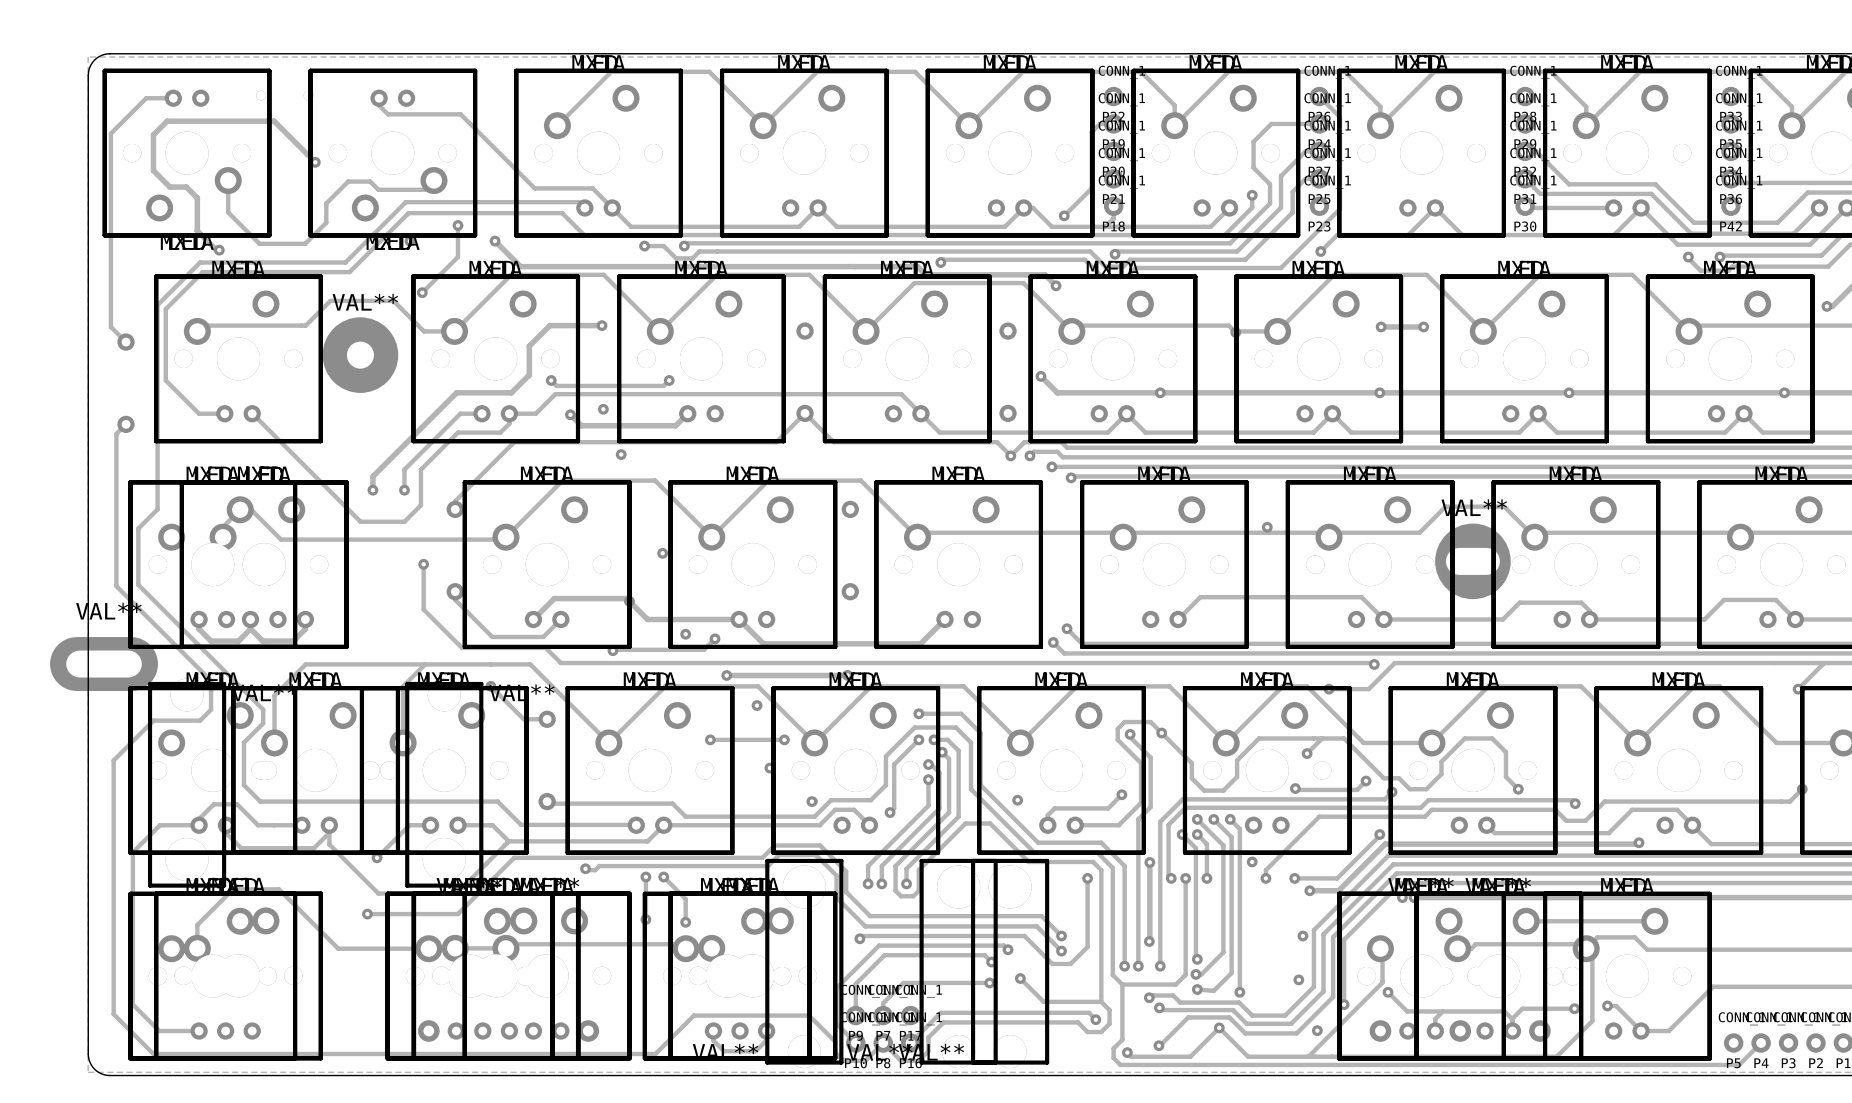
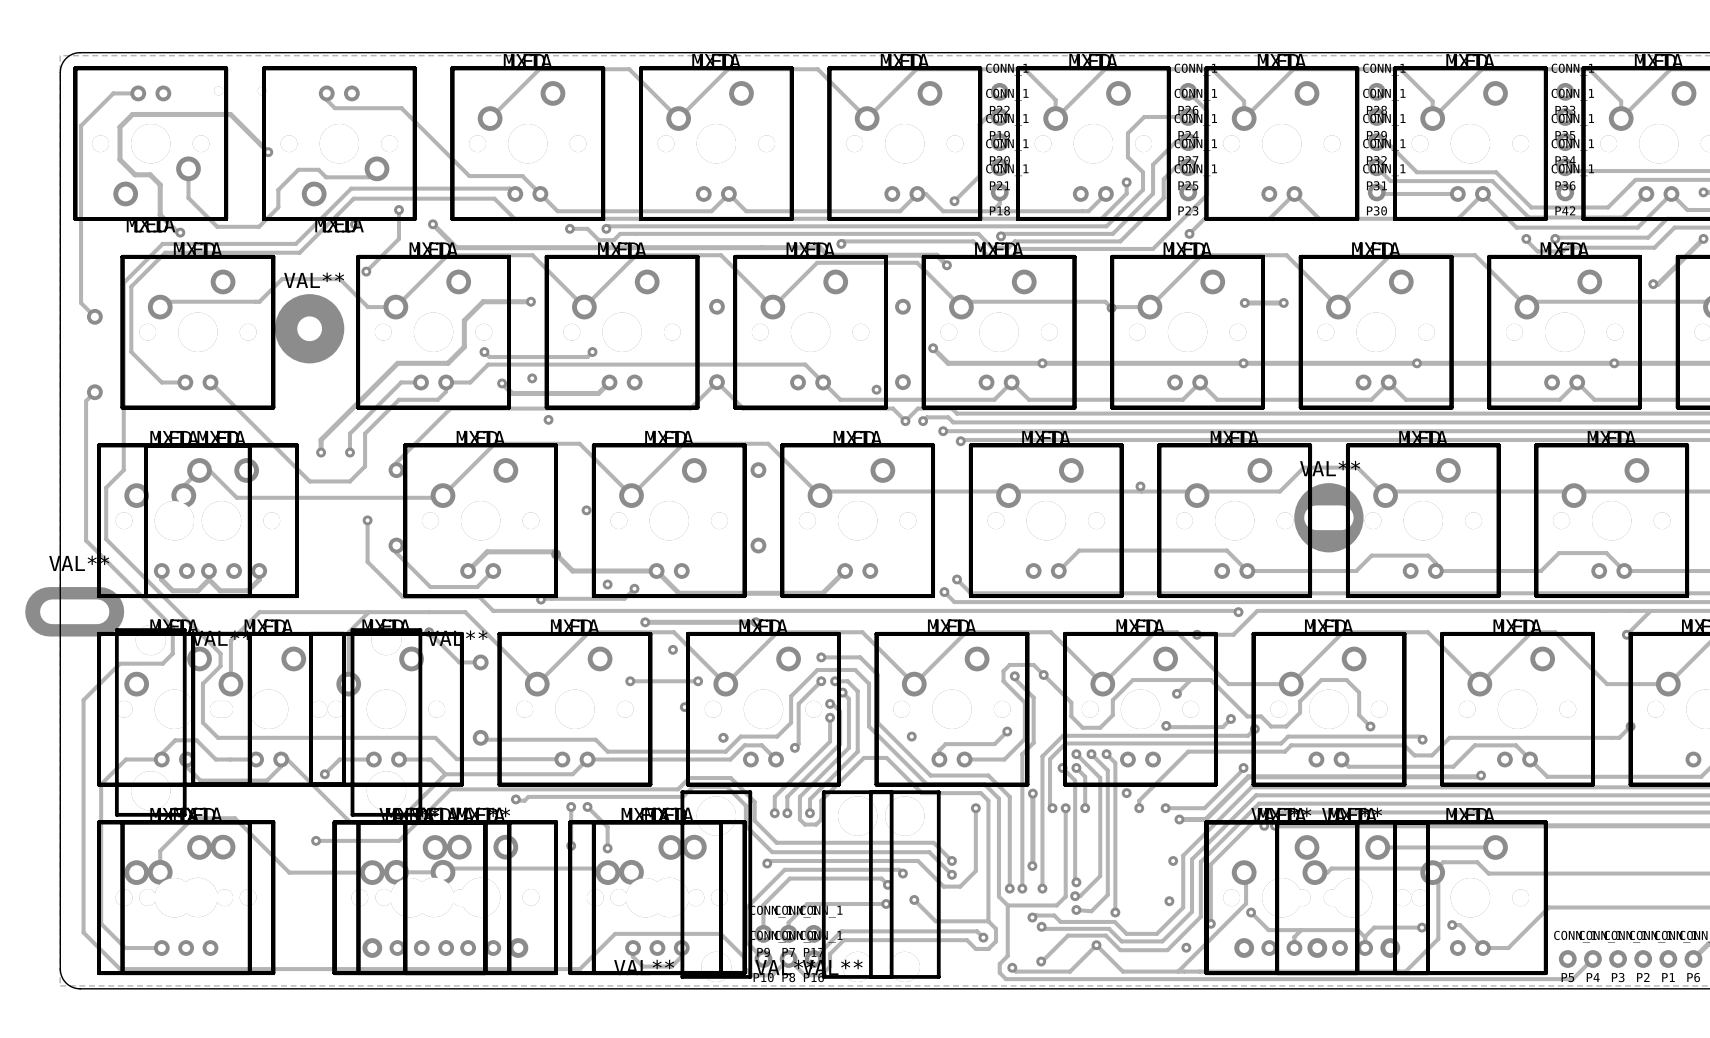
via: none -> (876, 389)
track: (409, 825) (377, 857) -> (354, 759) (339, 759) (324, 774)
track: (329, 832) (329, 844) (378, 893) (404, 893) -> (281, 759) (287, 759) (349, 822)
via position: (377, 857) -> (324, 774)

